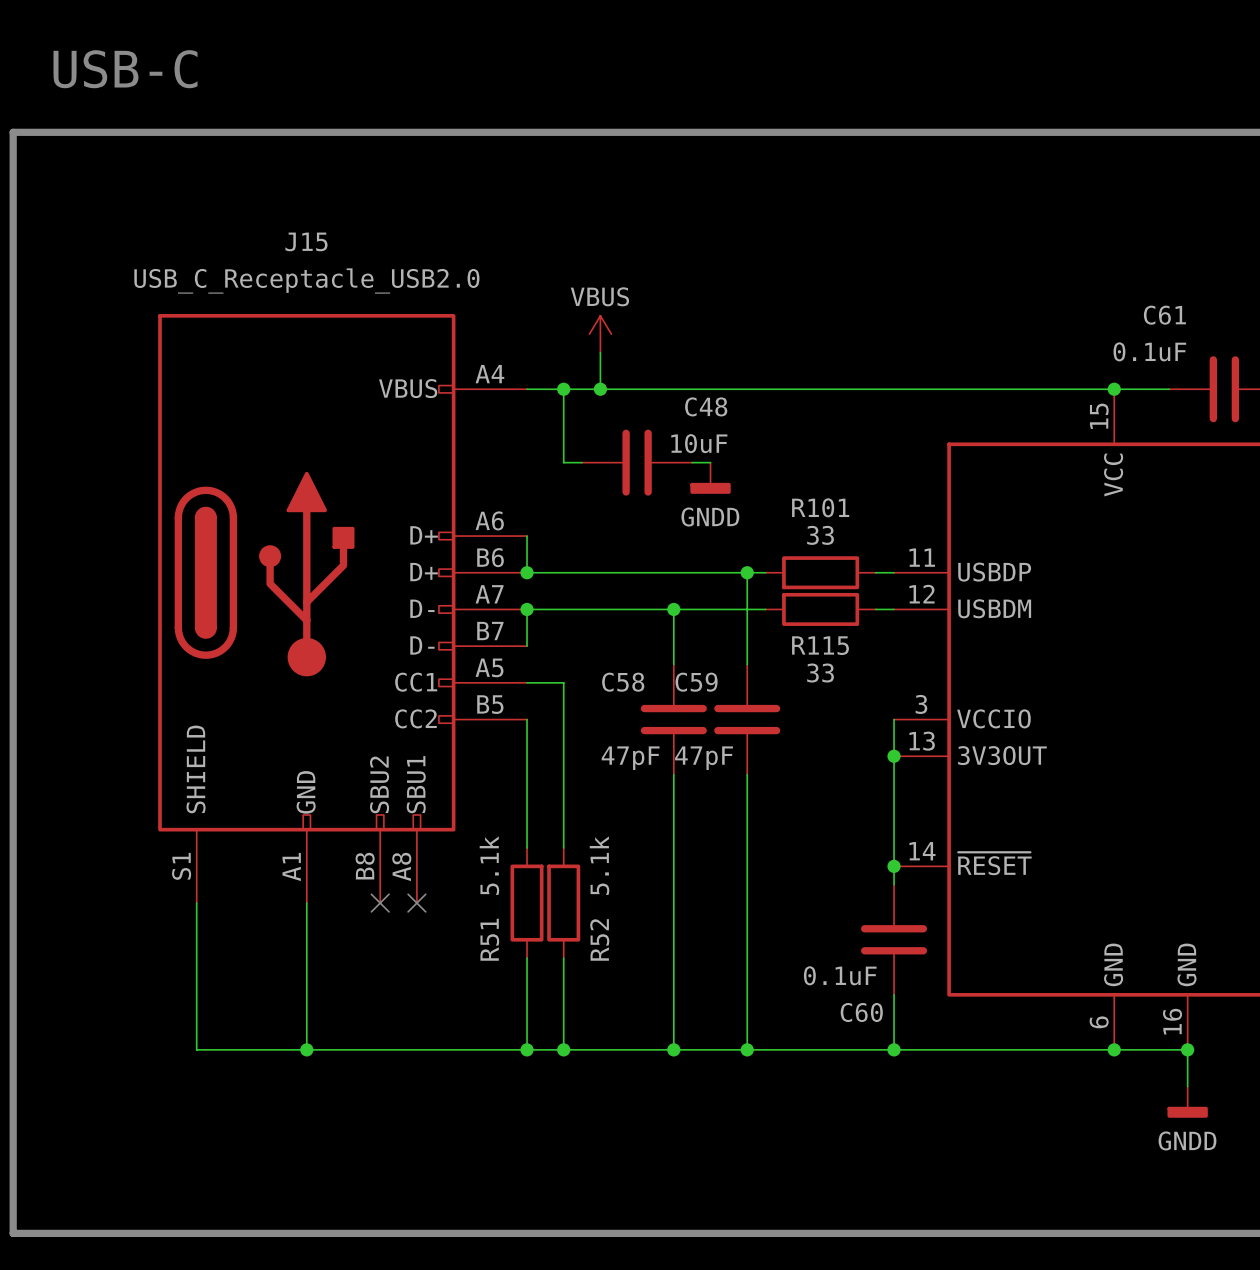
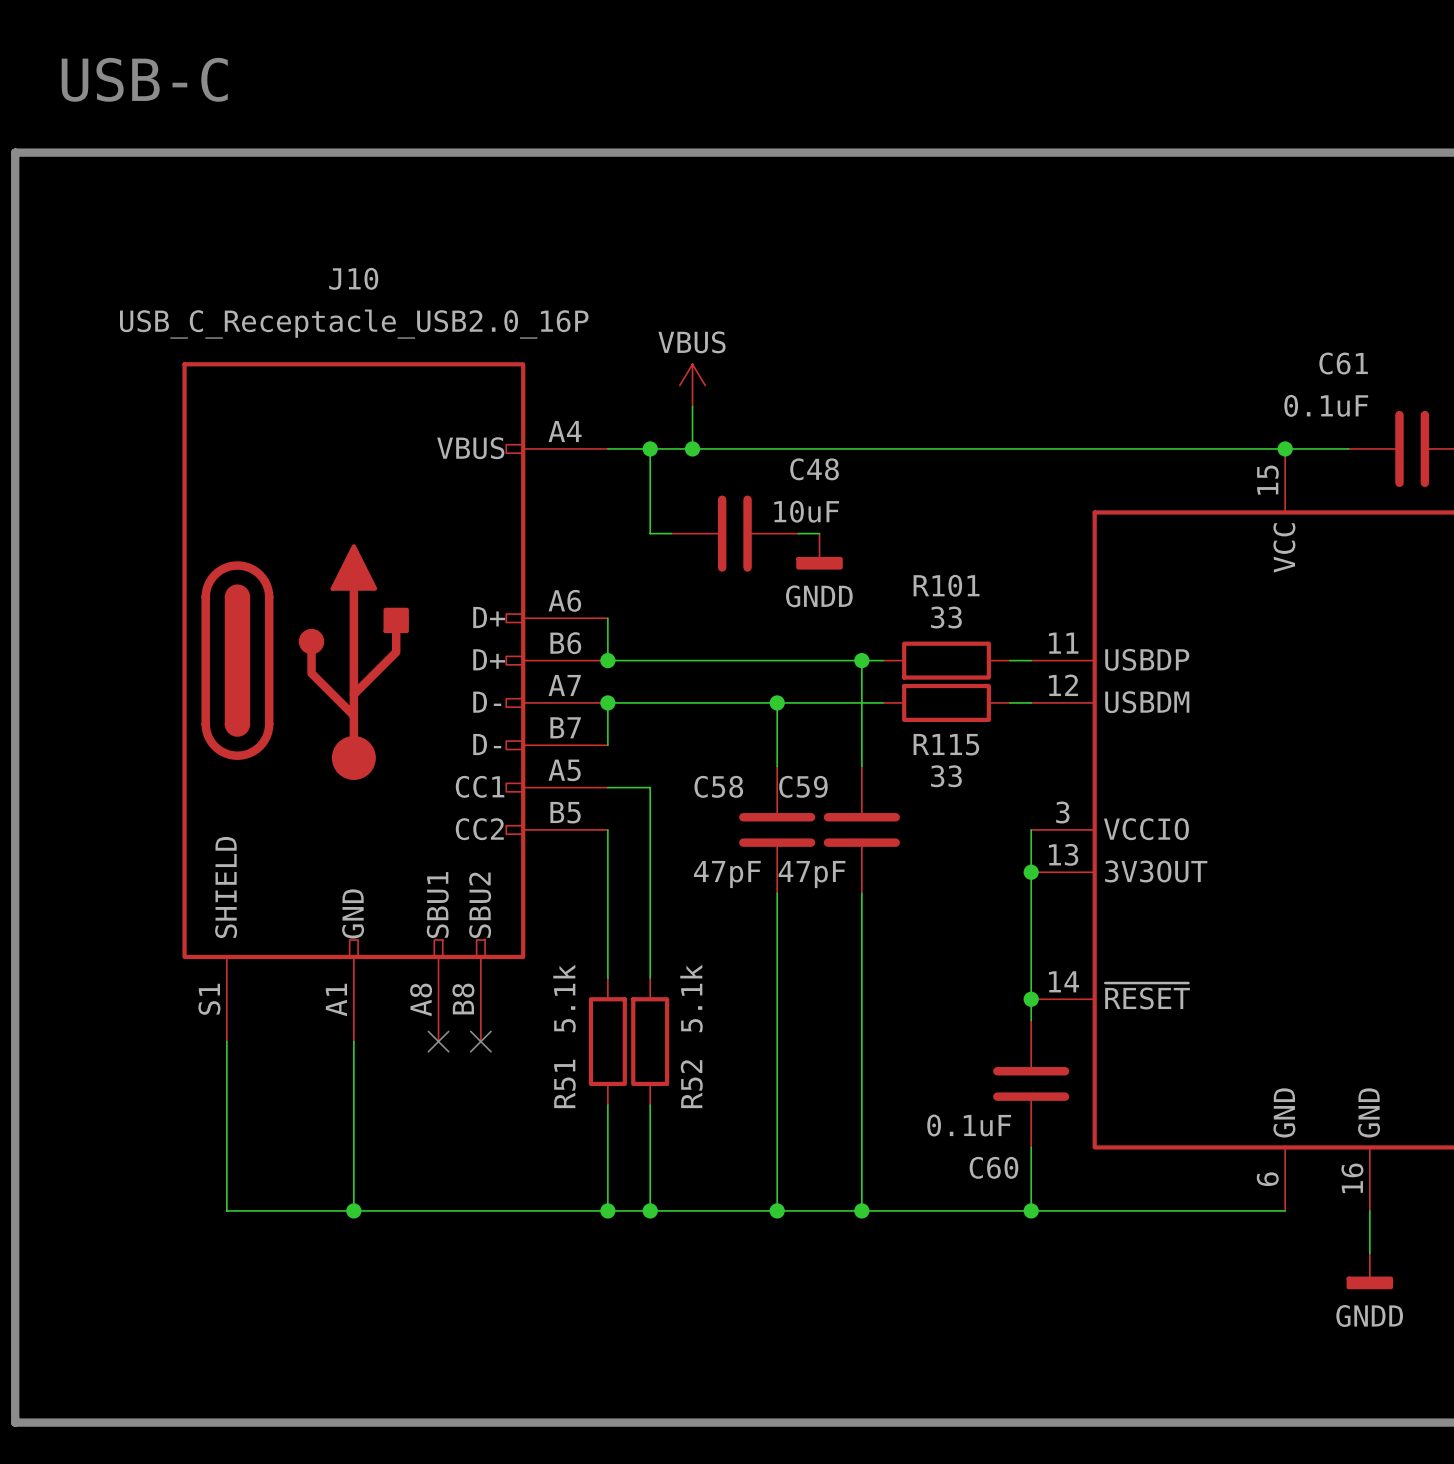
J15 name: J15 (306, 241) -> J10 (353, 278)
J15 value: USB_C_Receptacle_USB2.0 (306, 280) -> USB_C_Receptacle_USB2.0_16P (354, 324)
J15 pin name: SBU2 (379, 784) -> SBU1 (437, 905)
J15 pin name: SBU1 (416, 784) -> SBU2 (480, 905)
J15 pin number: B8 (365, 866) -> A8 (421, 999)
J15 pin number: A8 (401, 866) -> B8 (463, 999)
wire: (1114, 1049) (1187, 1049) -> none
junction: (1114, 1049) -> none
junction: (1187, 1049) -> none

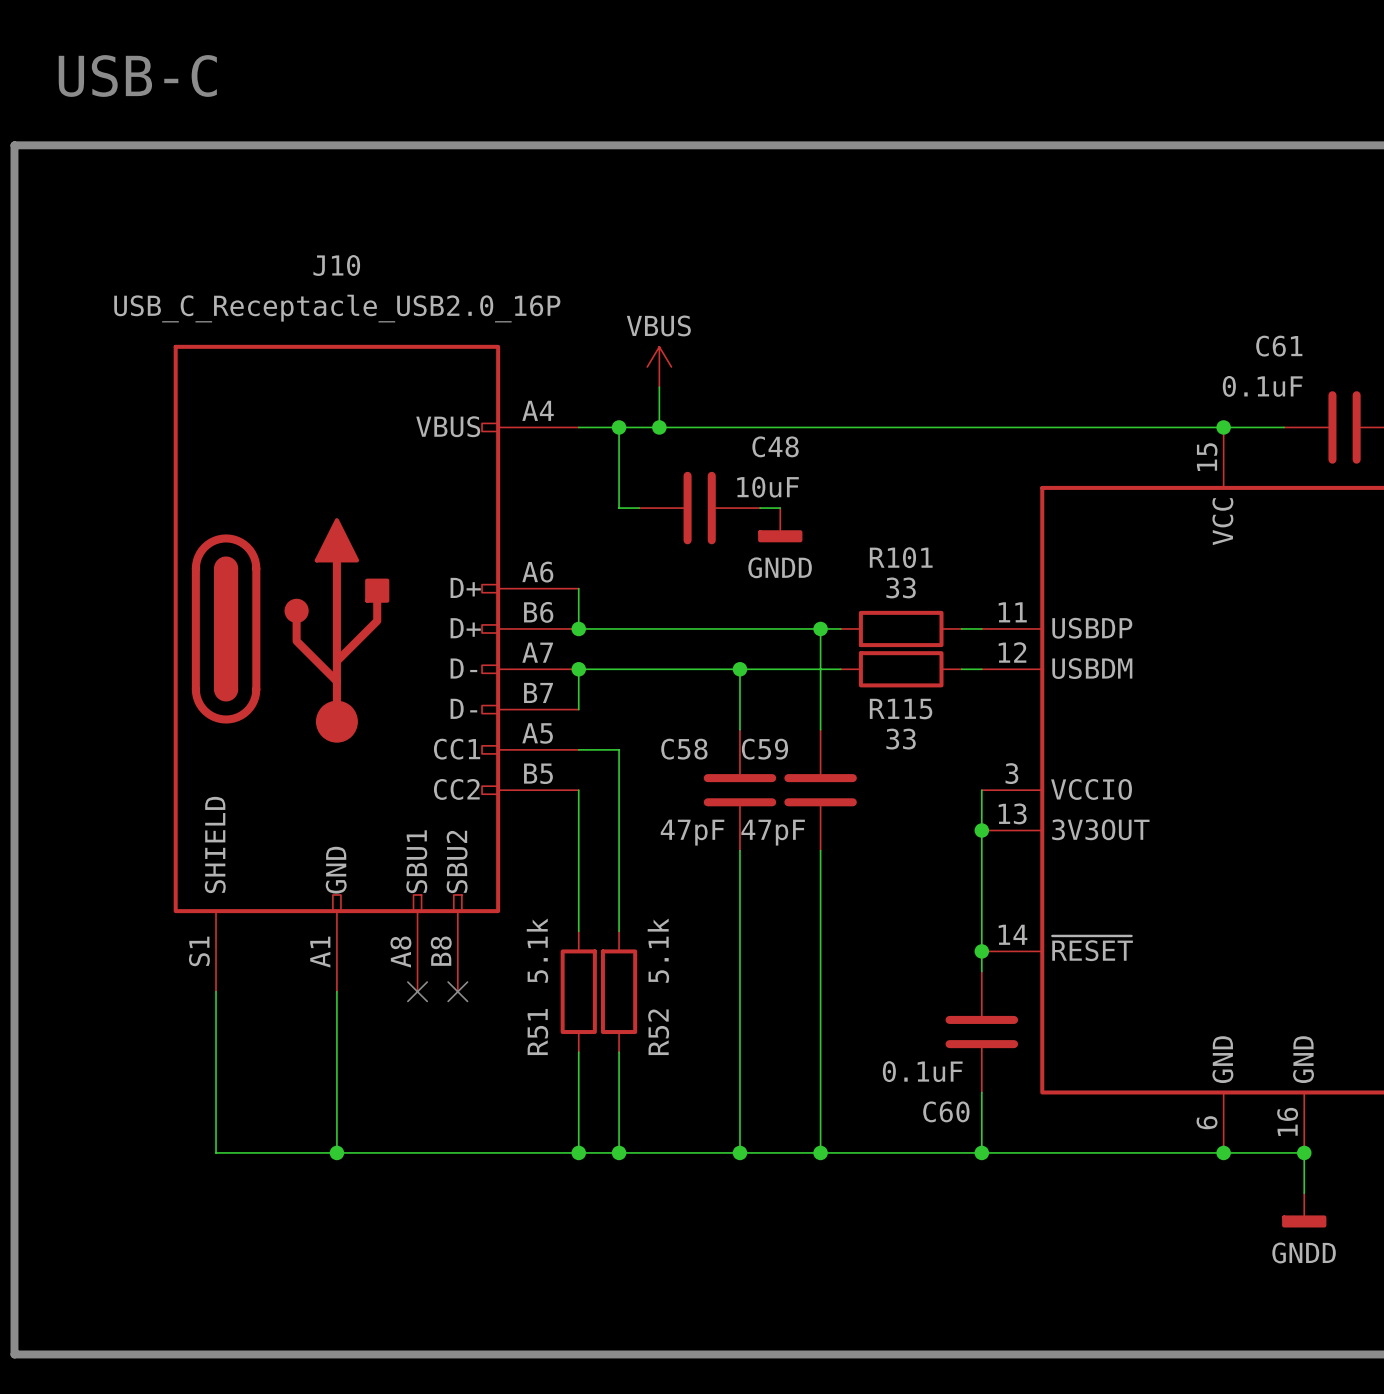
wire: none -> (1223, 1152) (1304, 1152)
junction: none -> (1223, 1152)
junction: none -> (1304, 1152)

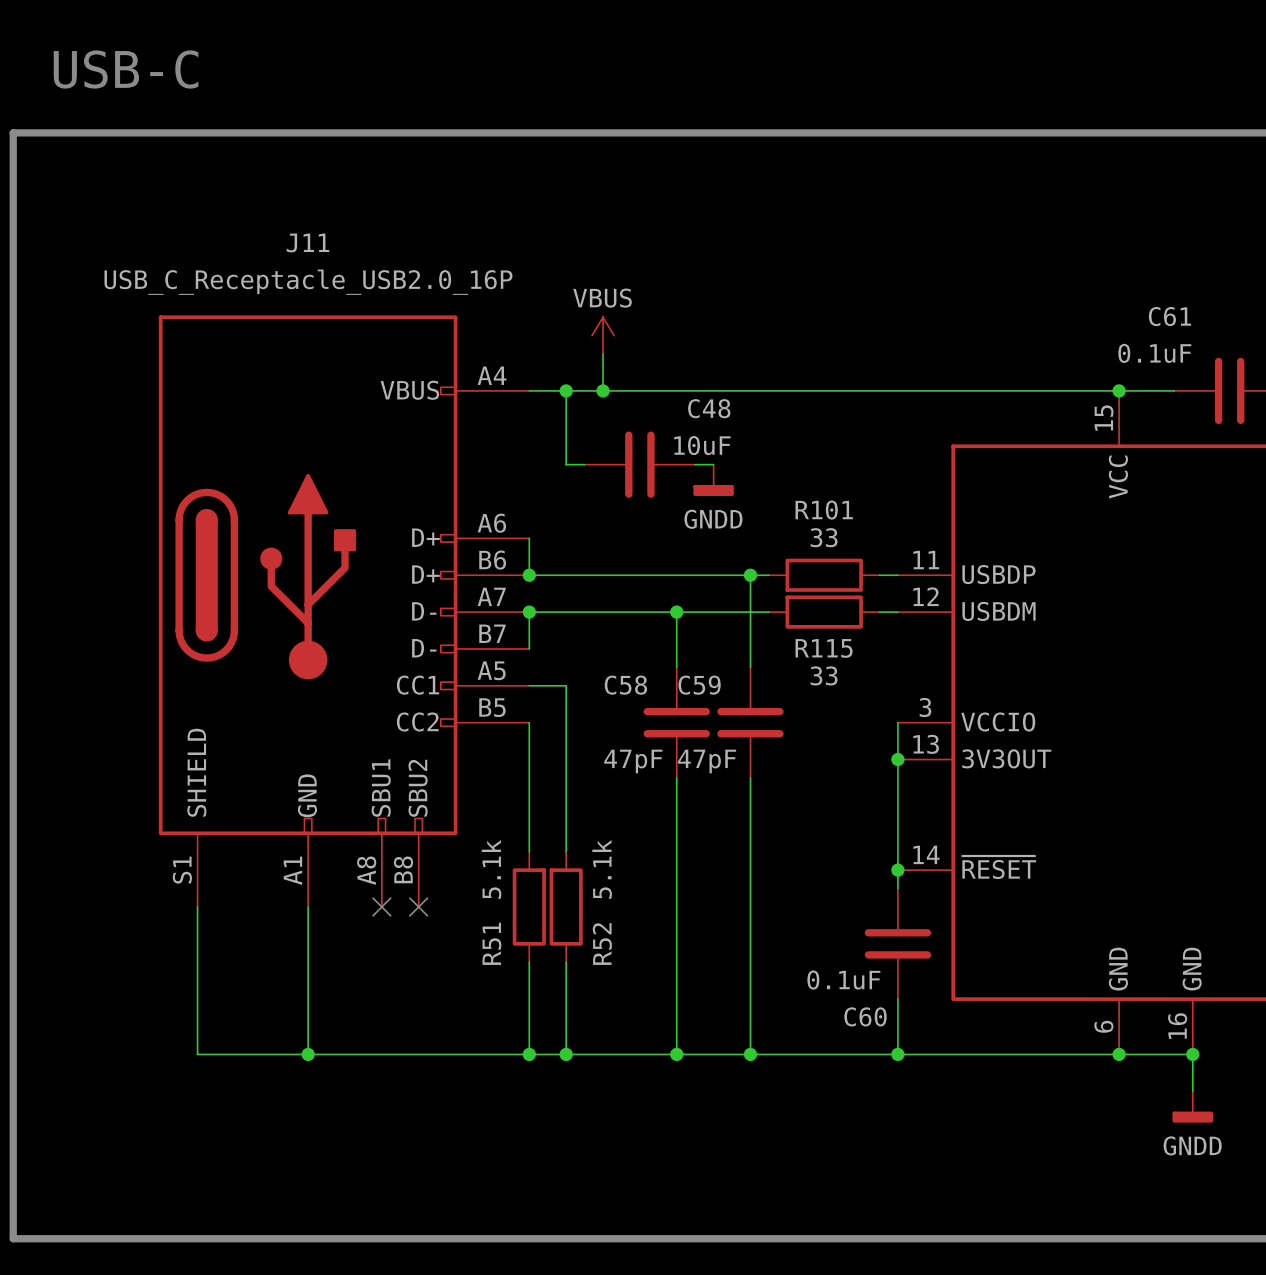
J10 name: J10 (336, 265) -> J11 (307, 242)

